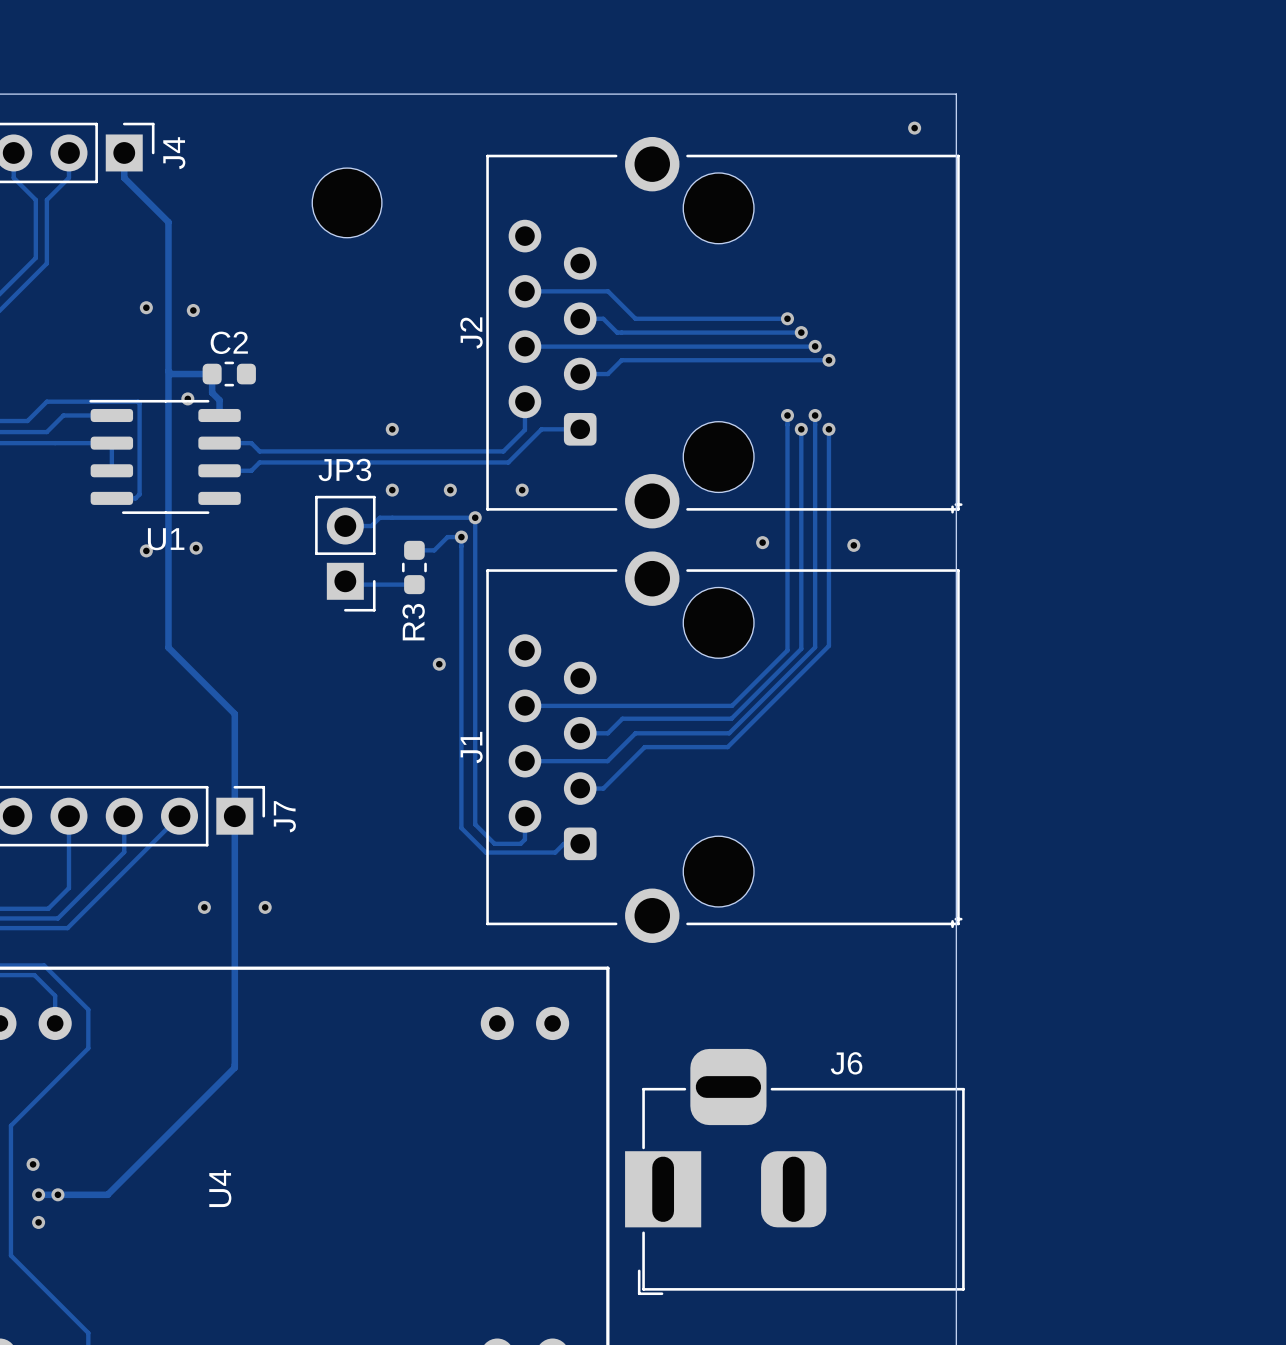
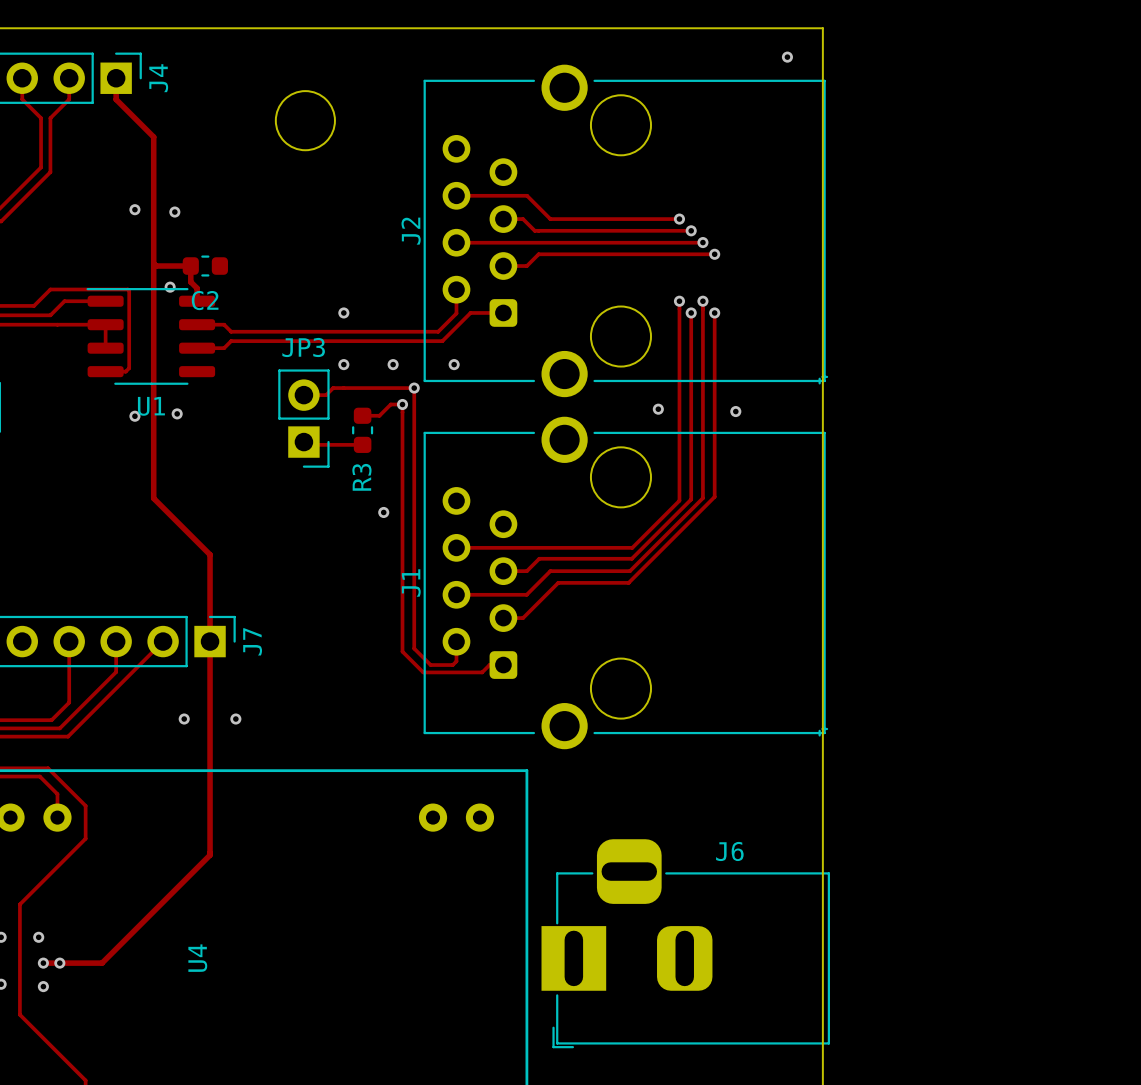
C2 name position: C2 (229, 342) -> C2 (205, 300)

